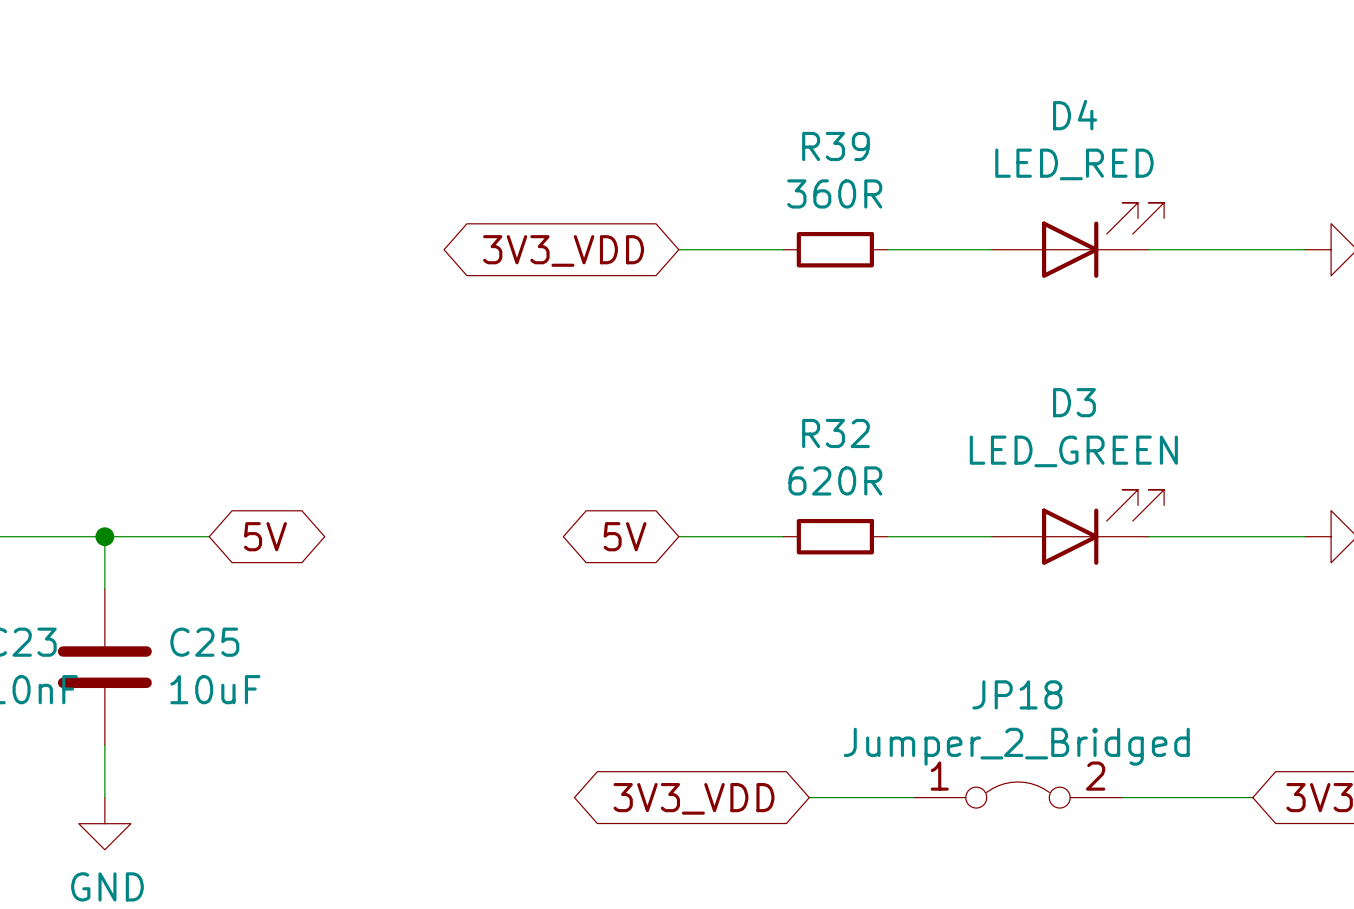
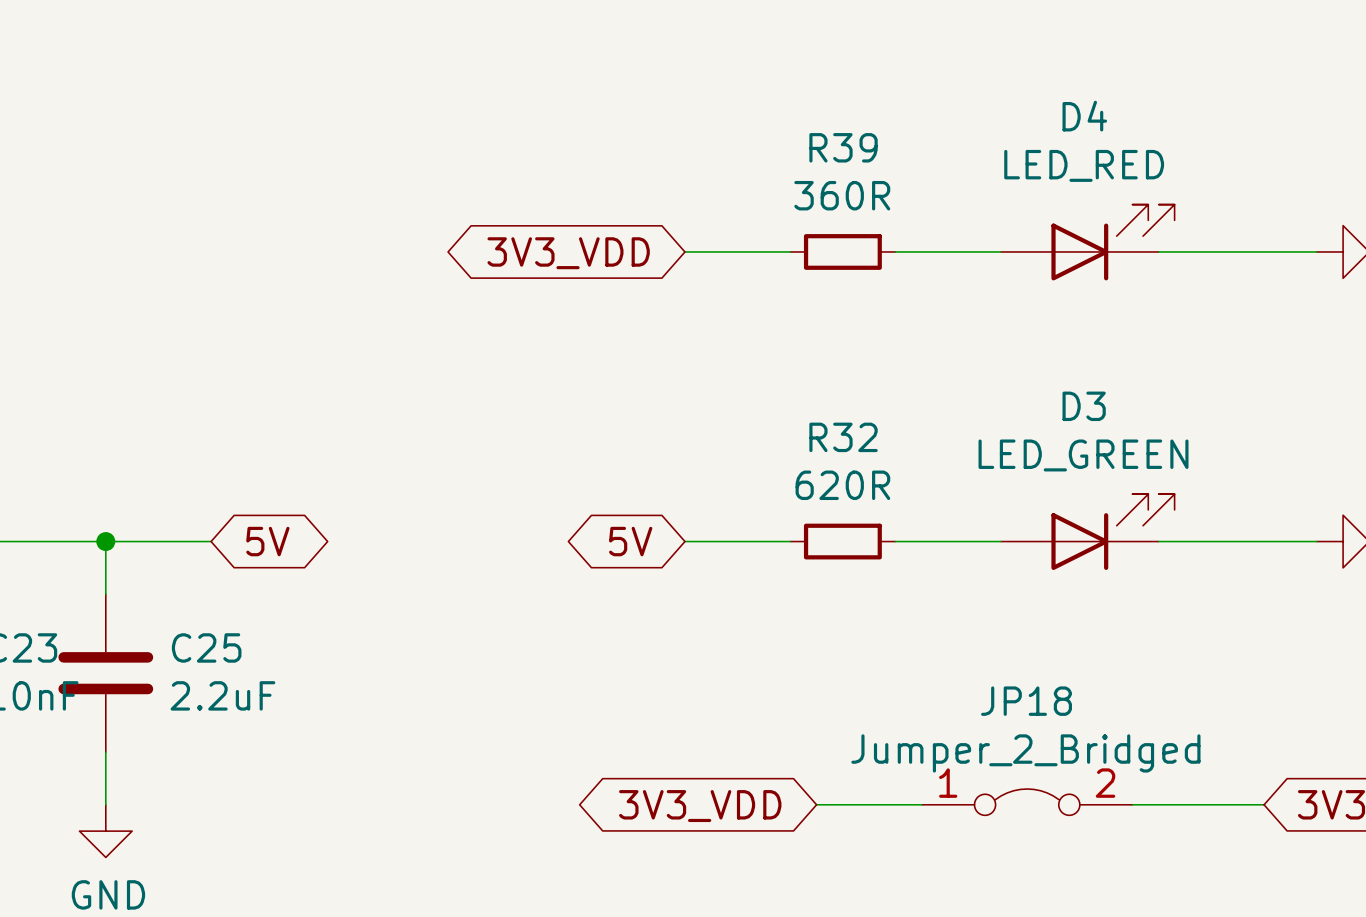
C25 value: 10uF (215, 689) -> 2.2uF (222, 695)

